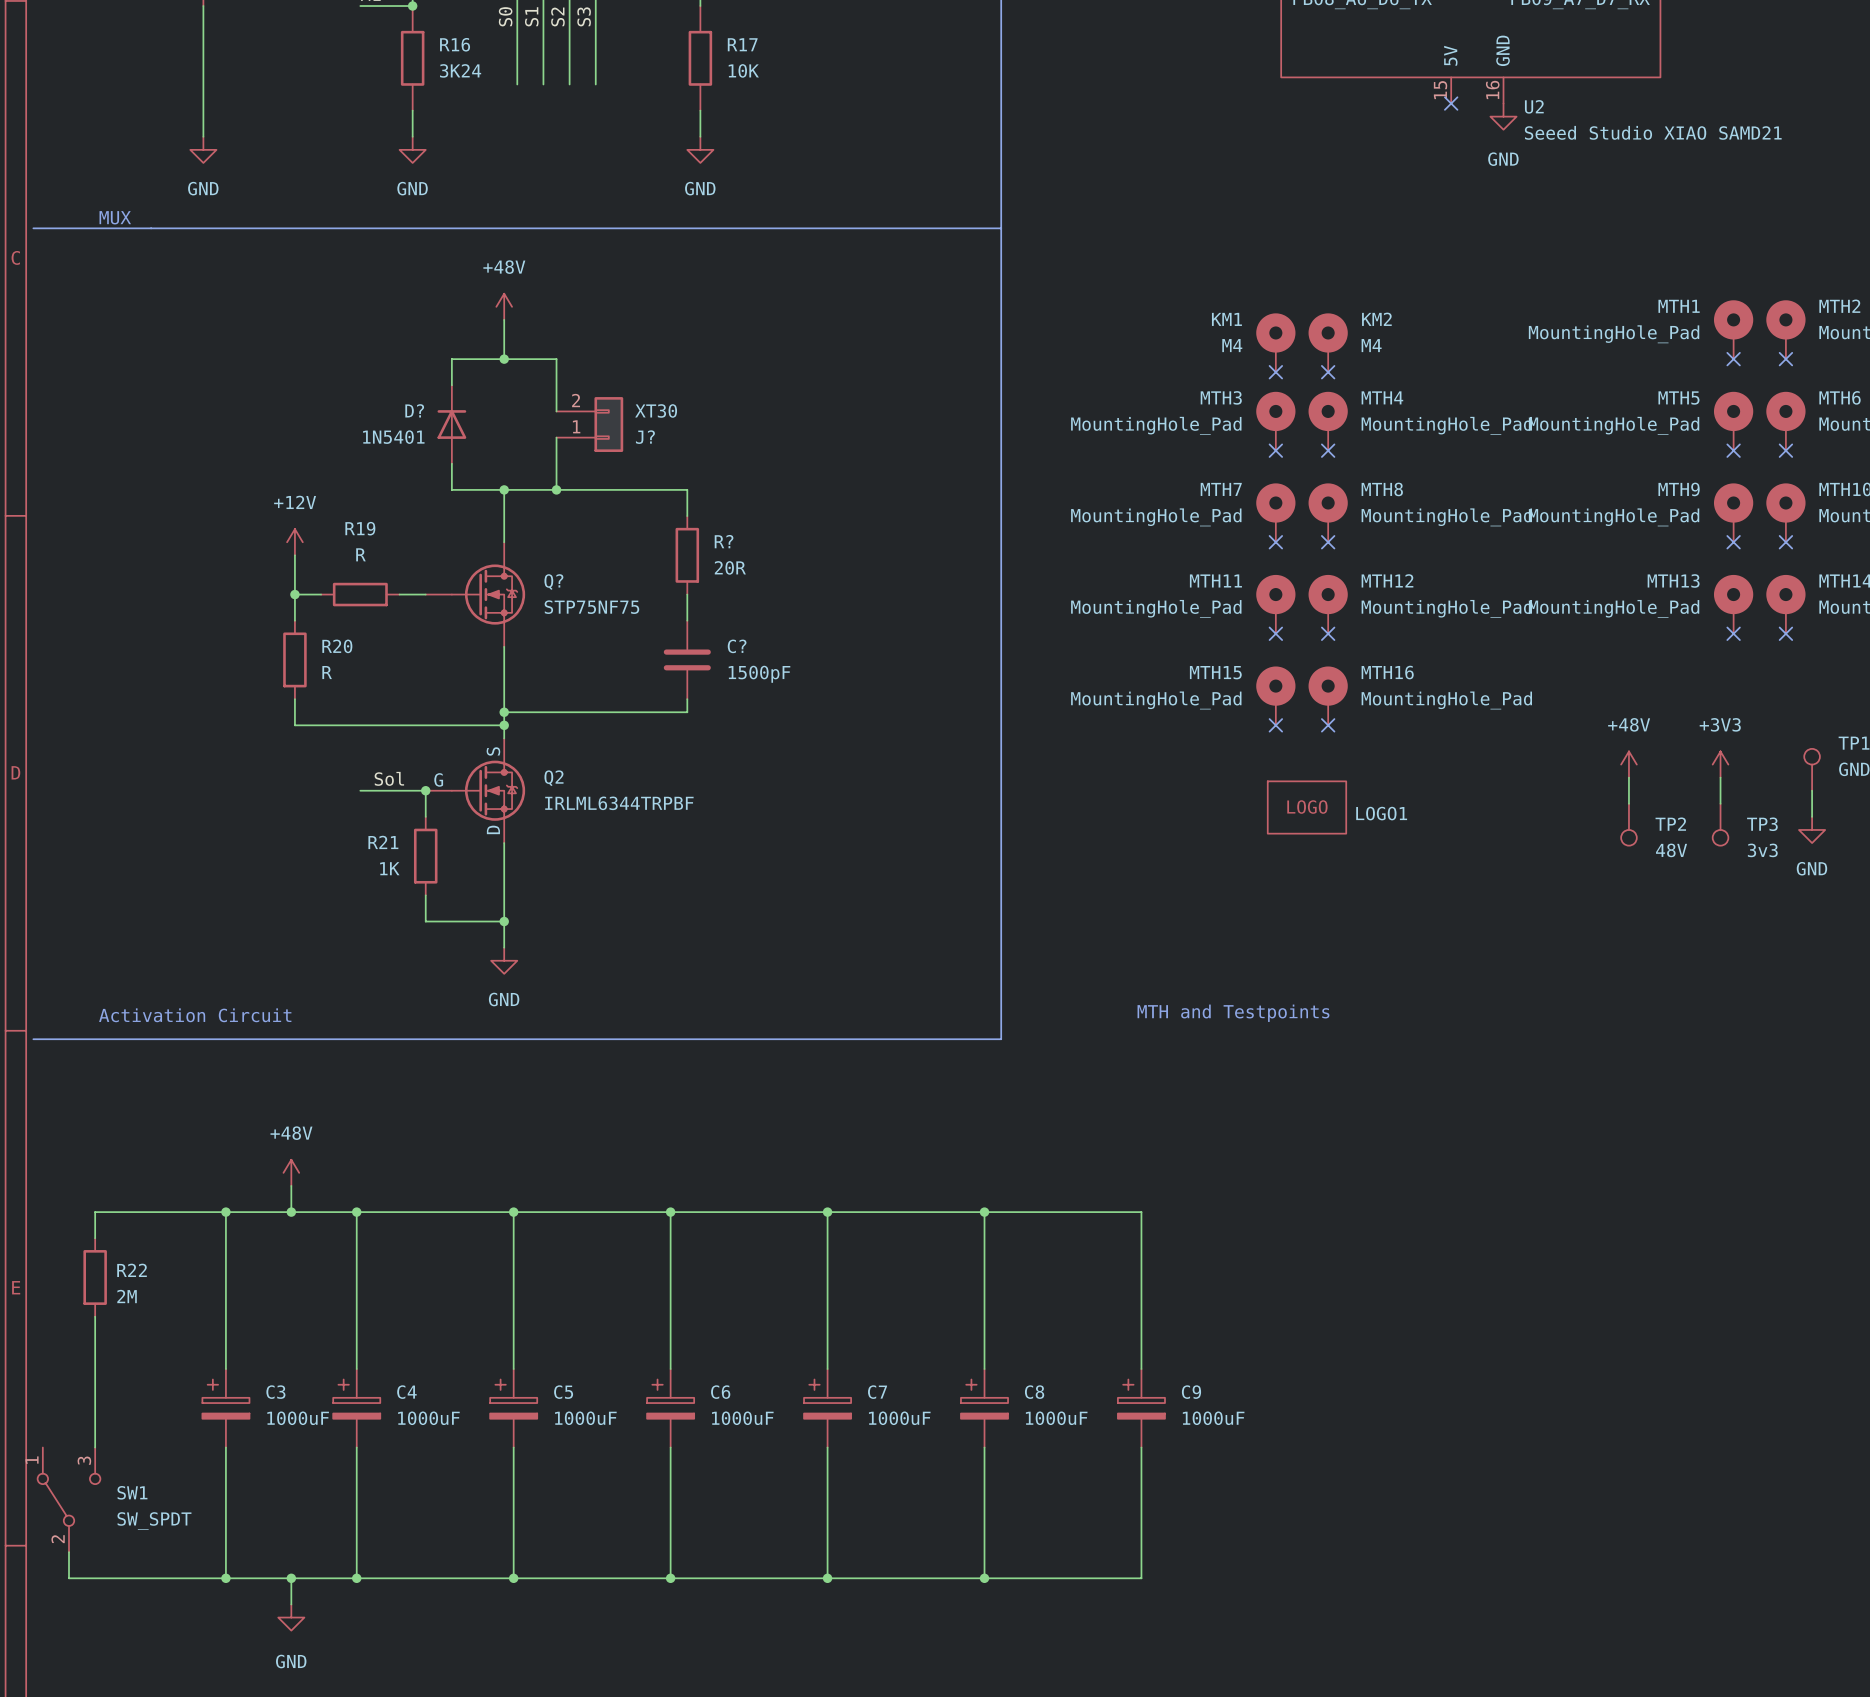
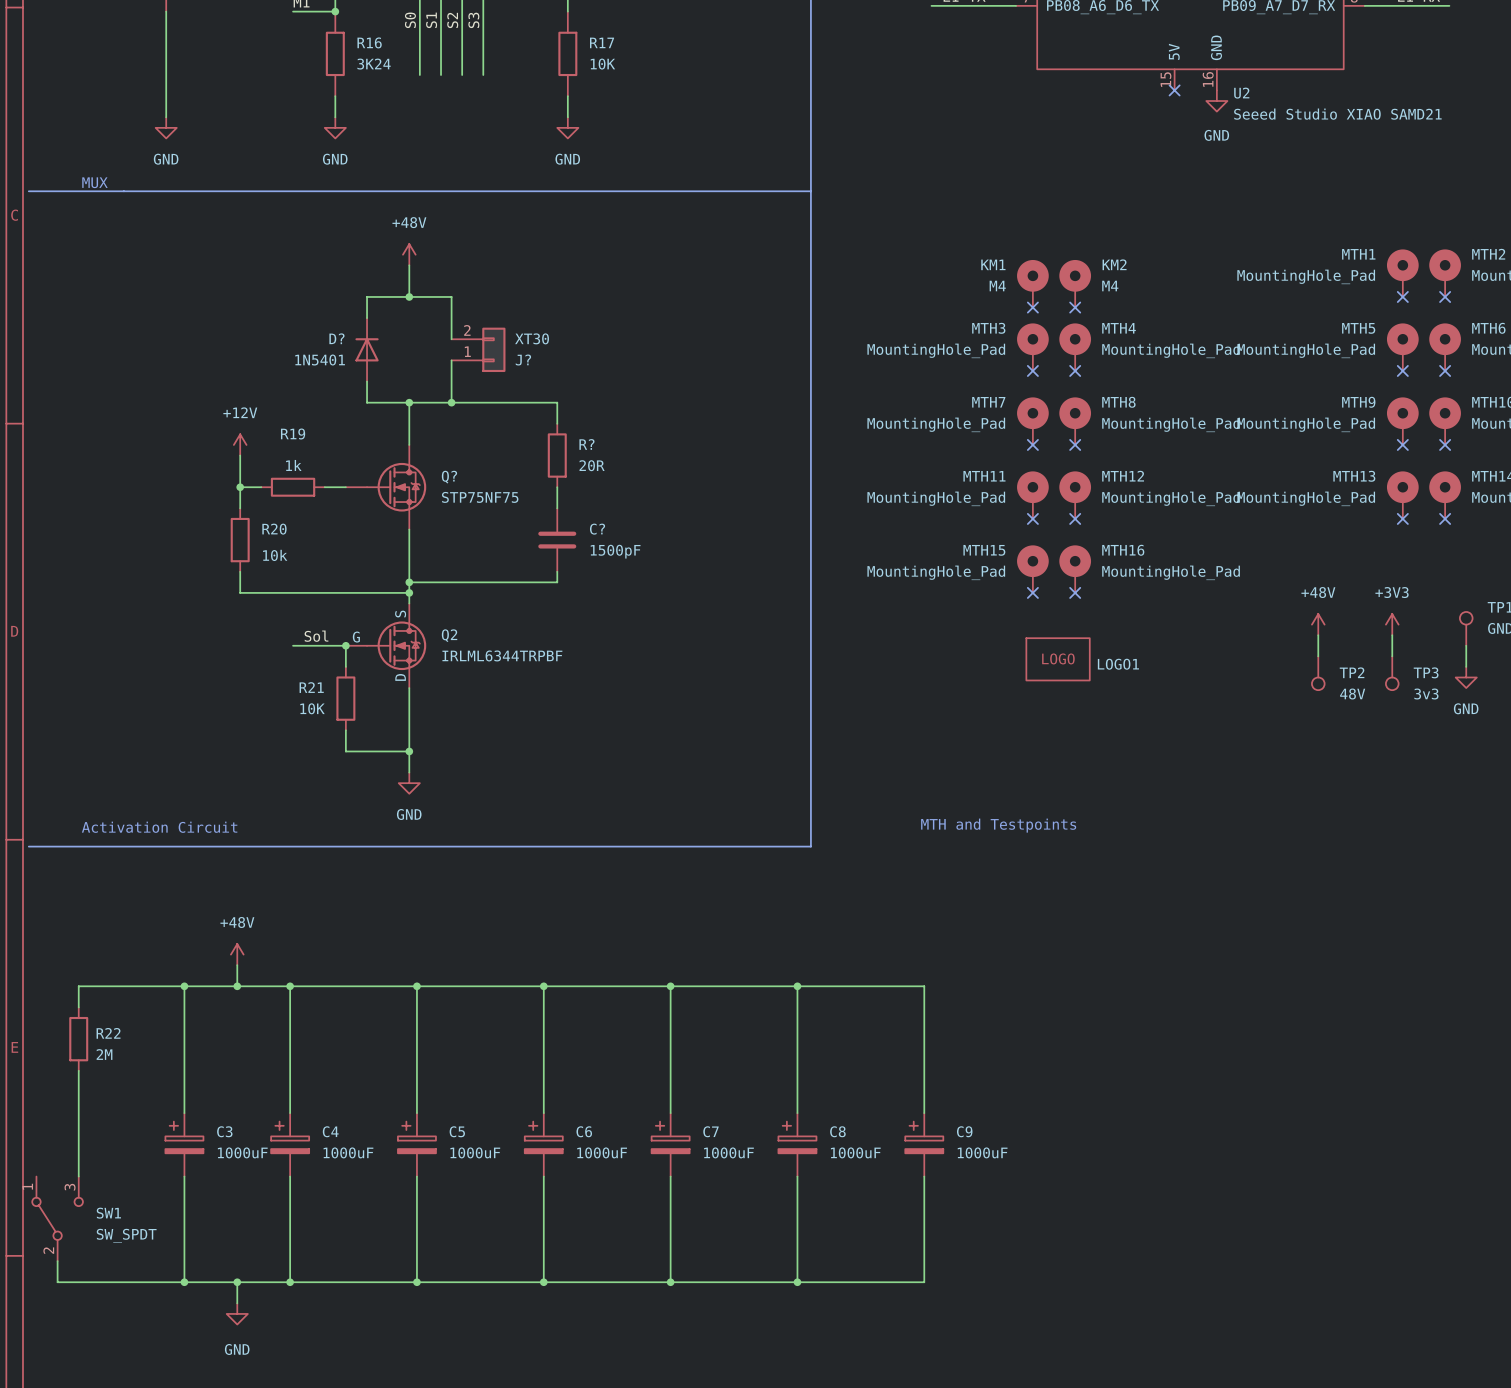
R19 value: R (360, 554) -> 1k (293, 465)
R20 value: R (327, 672) -> 10k (275, 555)
R21 value: 1K (389, 868) -> 10K (312, 708)

